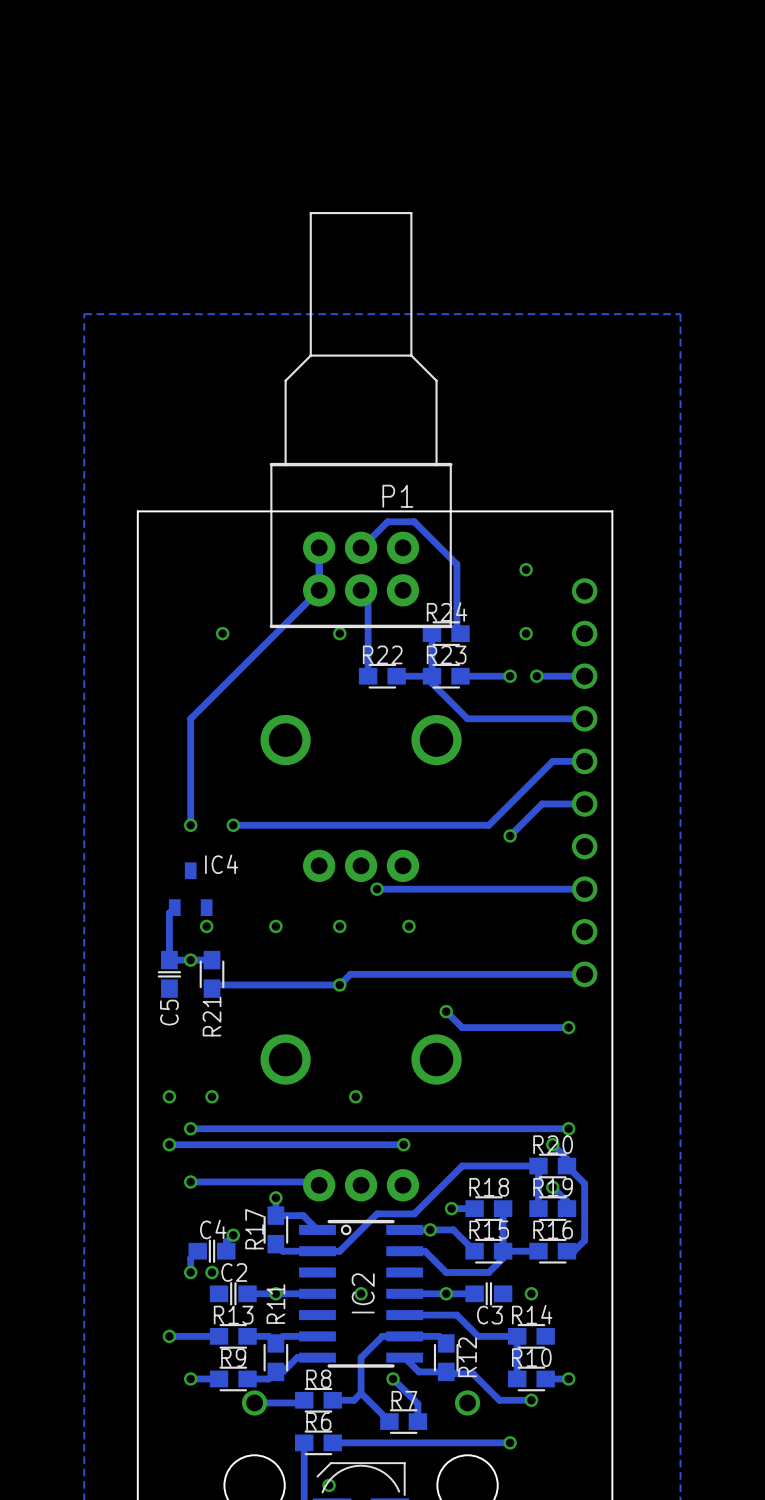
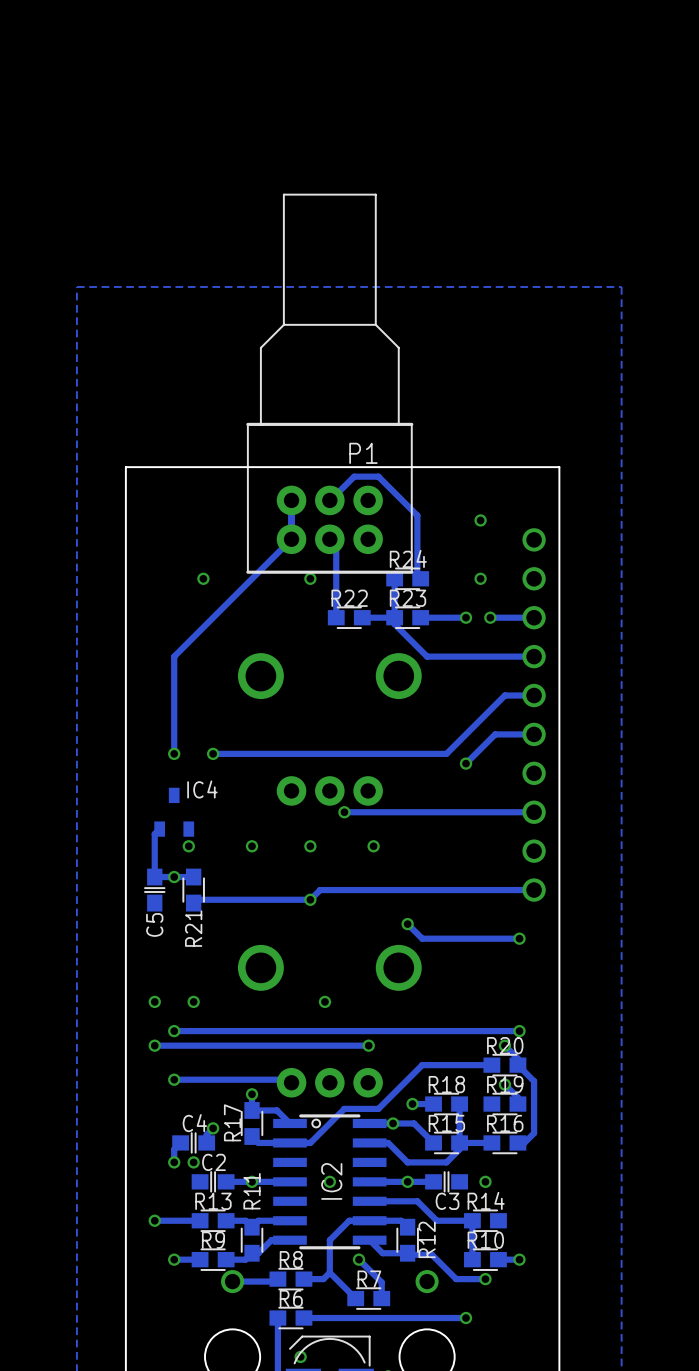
track: (538, 1166) (538, 1208) -> none

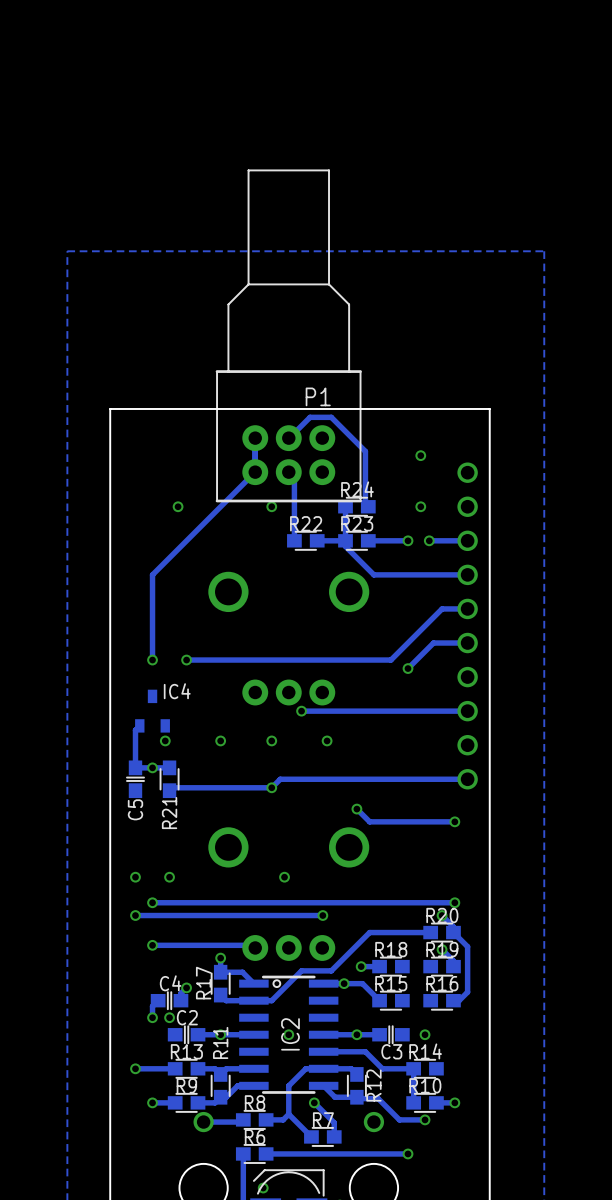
track: (459, 1104) (459, 1149) (446, 1162) (407, 1162) (388, 1142) (369, 1142) -> none
track: (491, 1142) (459, 1142) -> none

